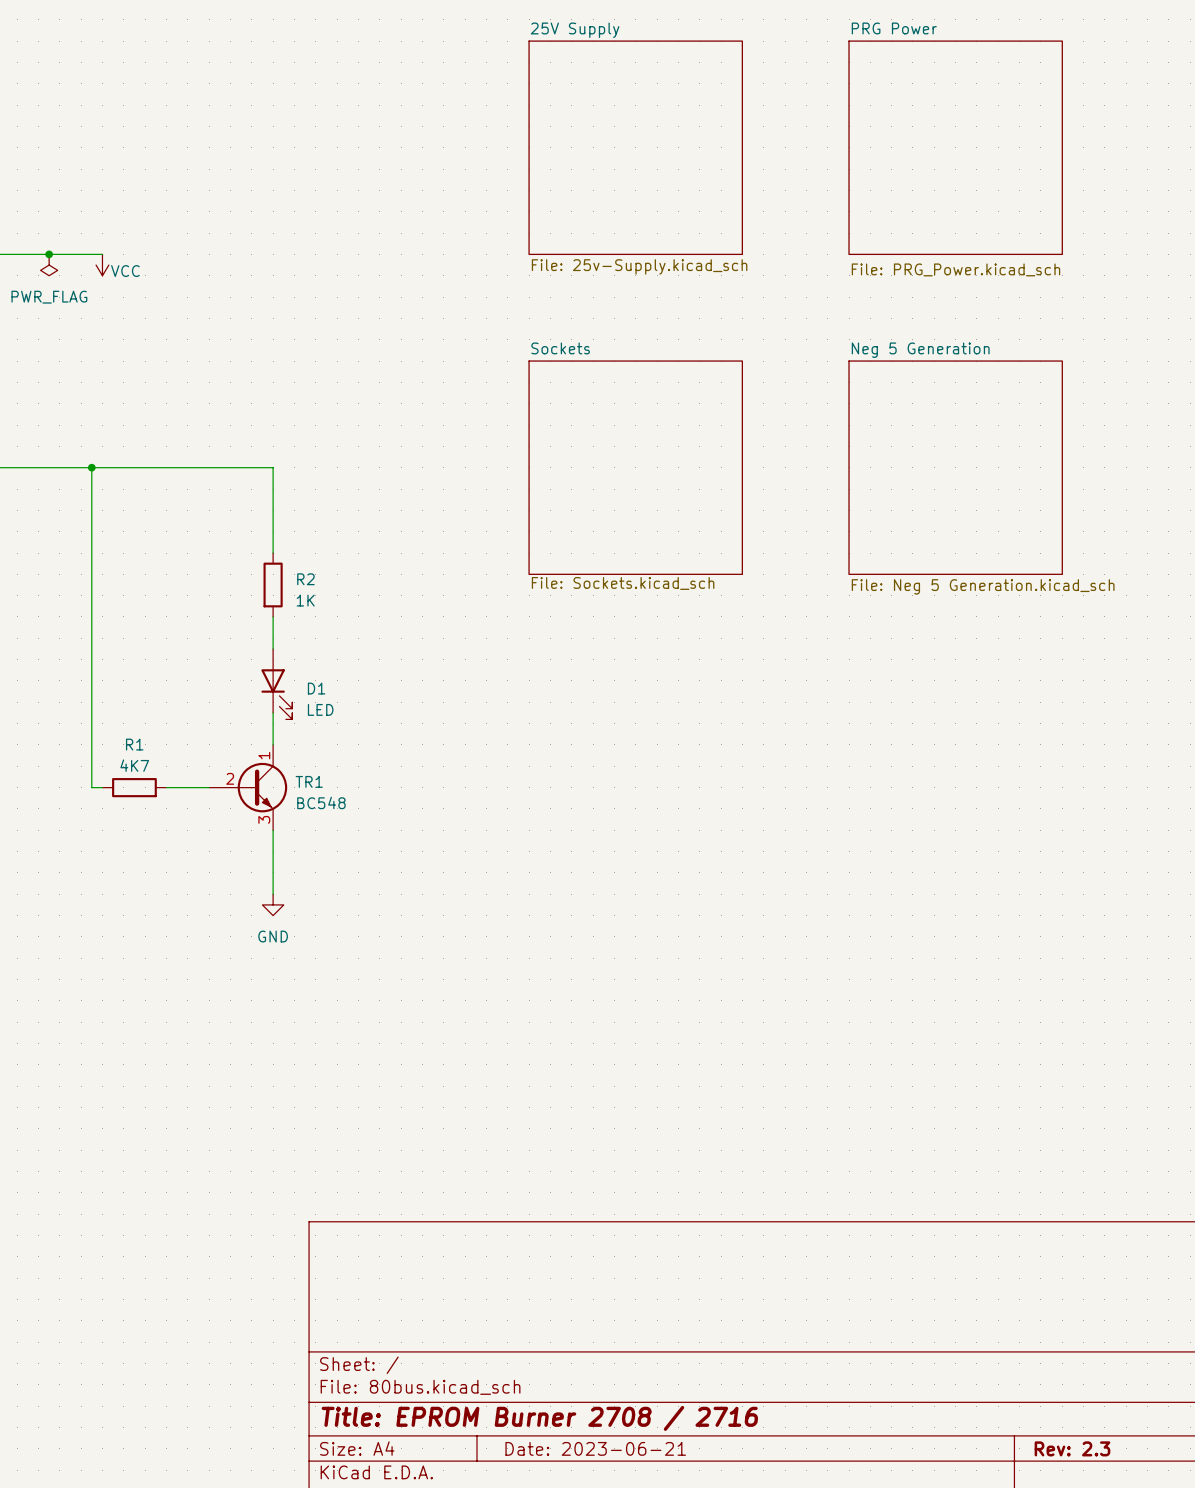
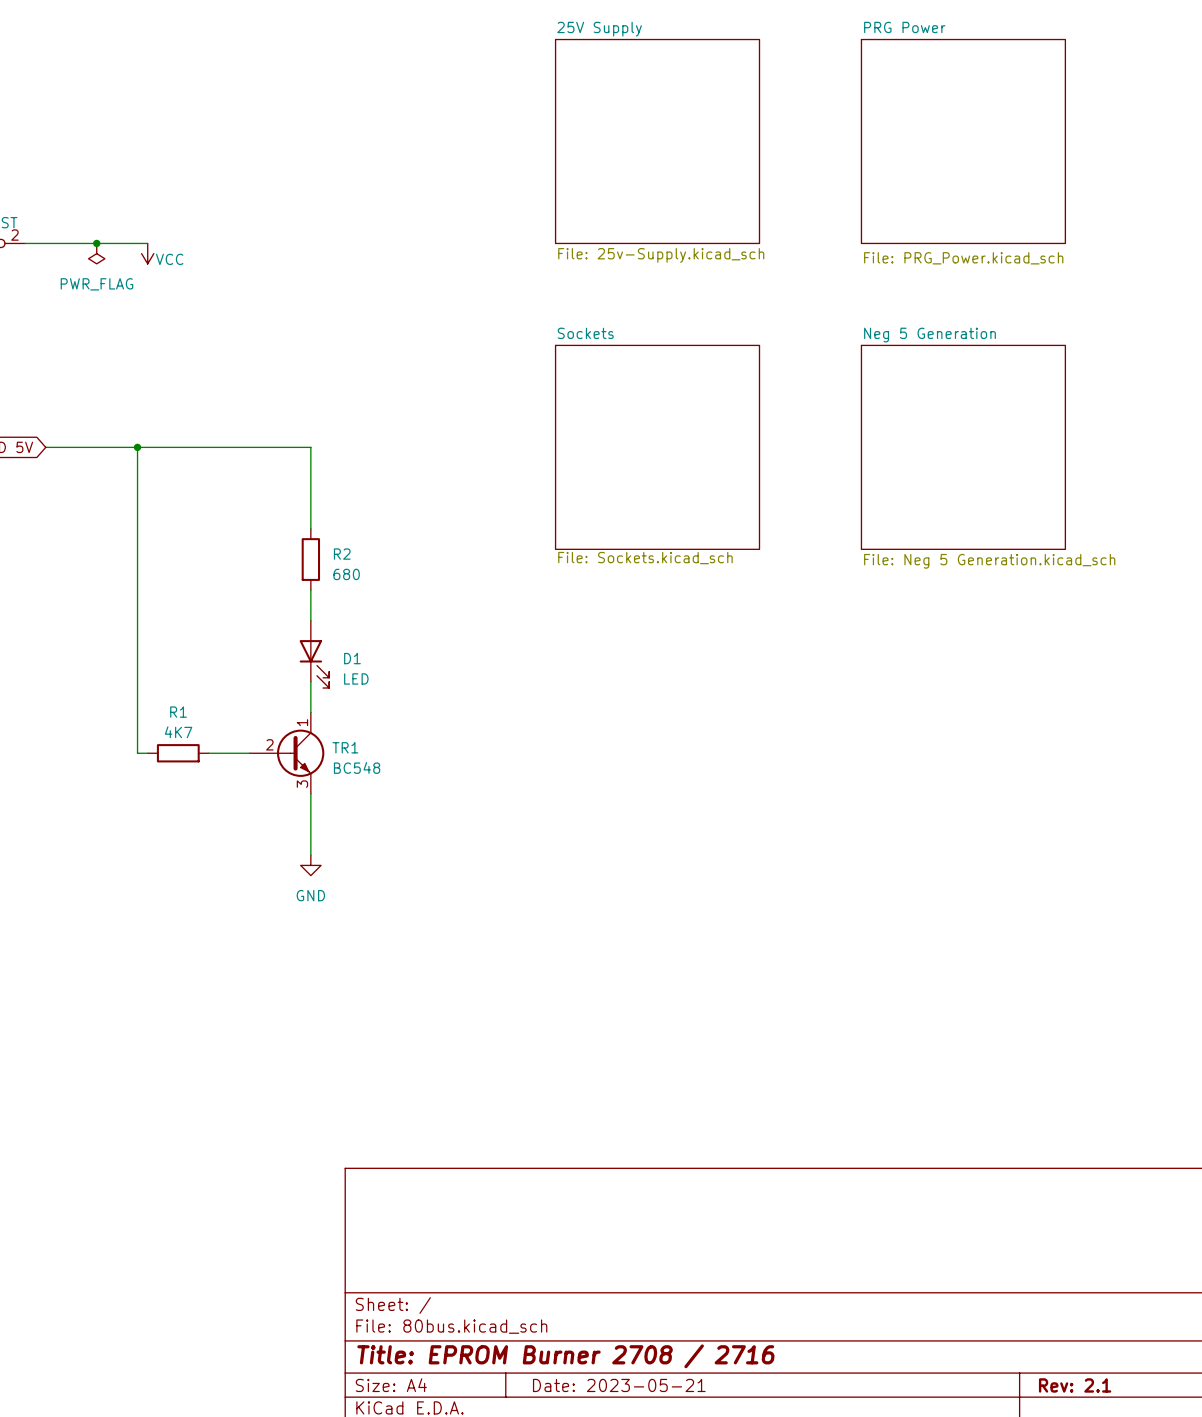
R2 value: 1K (305, 600) -> 680 (346, 574)
title block: Date: 2023-06-21 (595, 1448) -> Date: 2023-05-21 (619, 1385)
title block: Rev: 2.3 (1072, 1448) -> Rev: 2.1 (1075, 1385)

